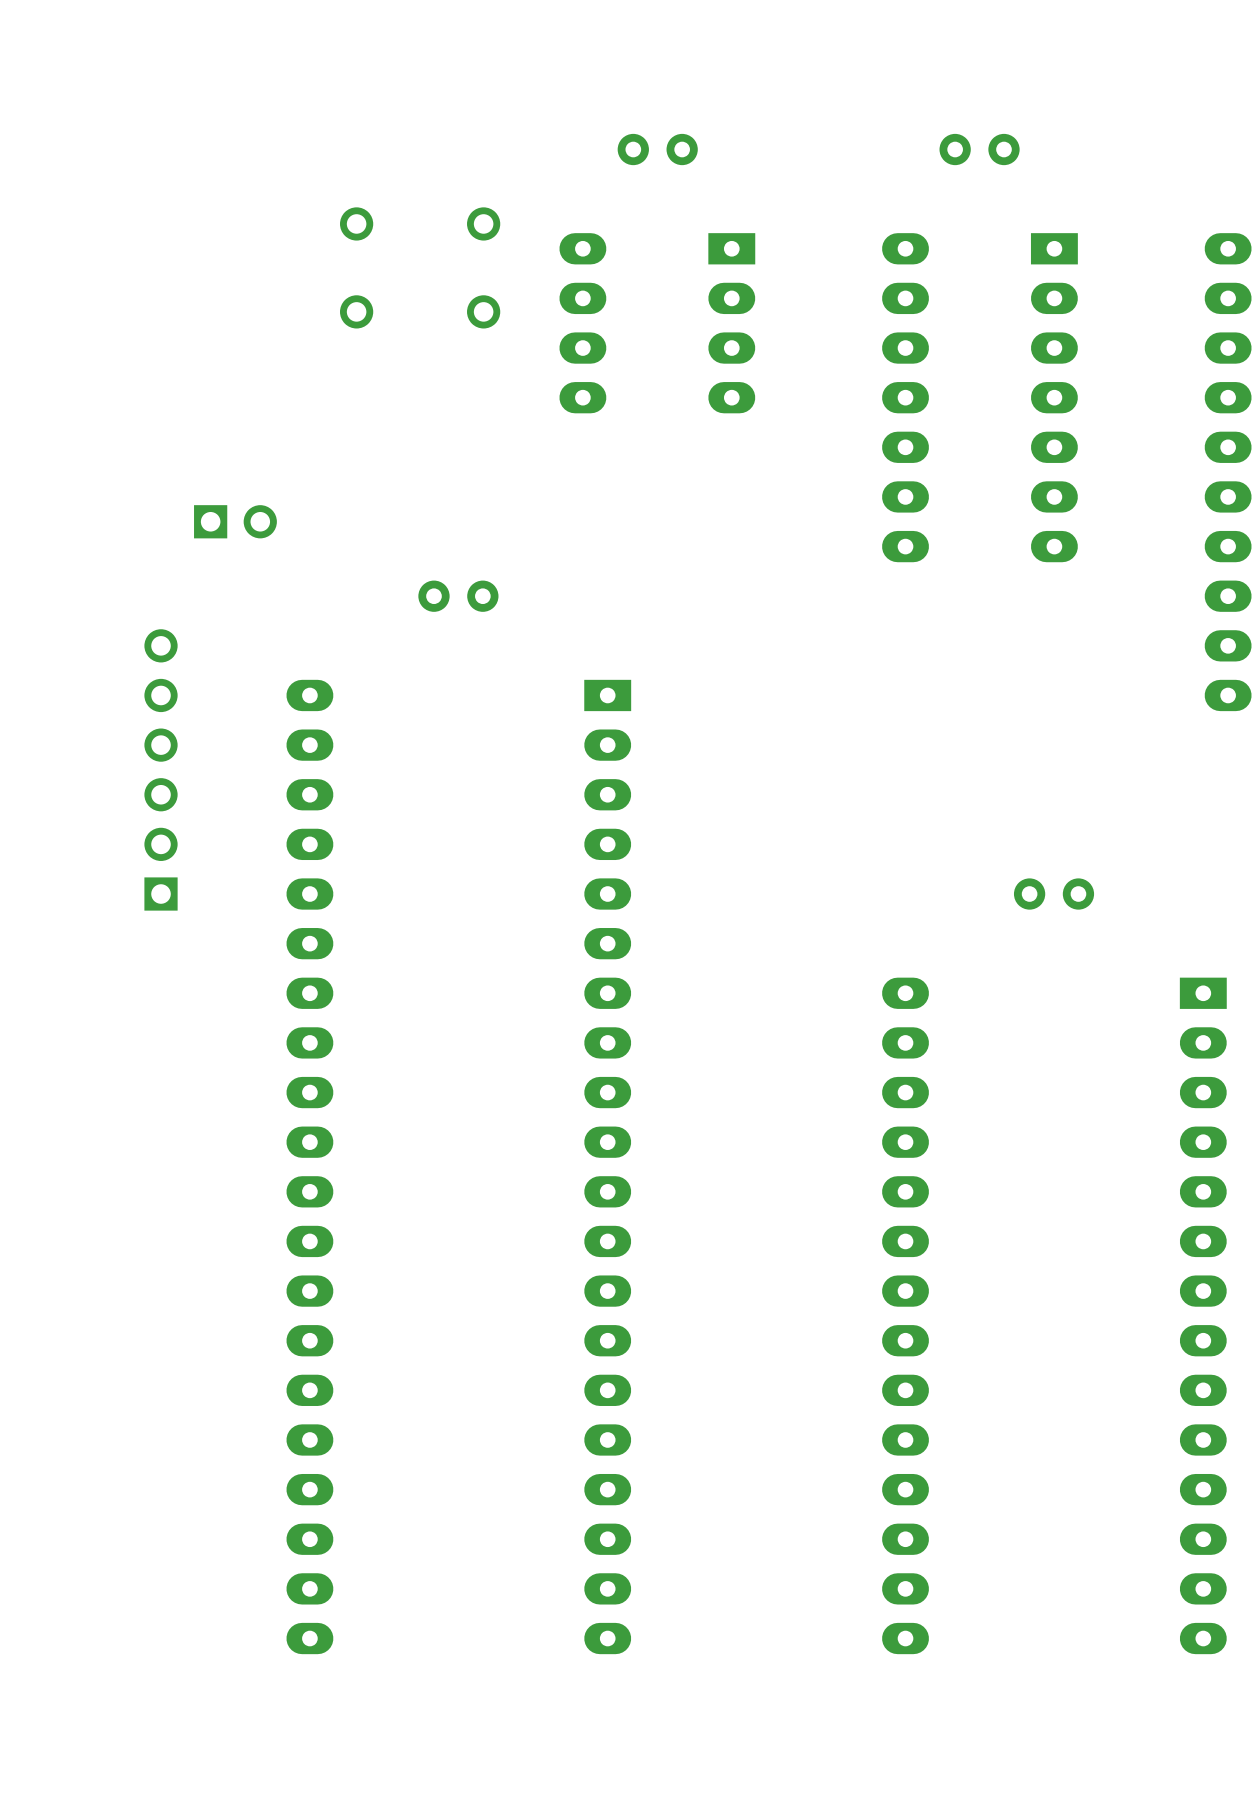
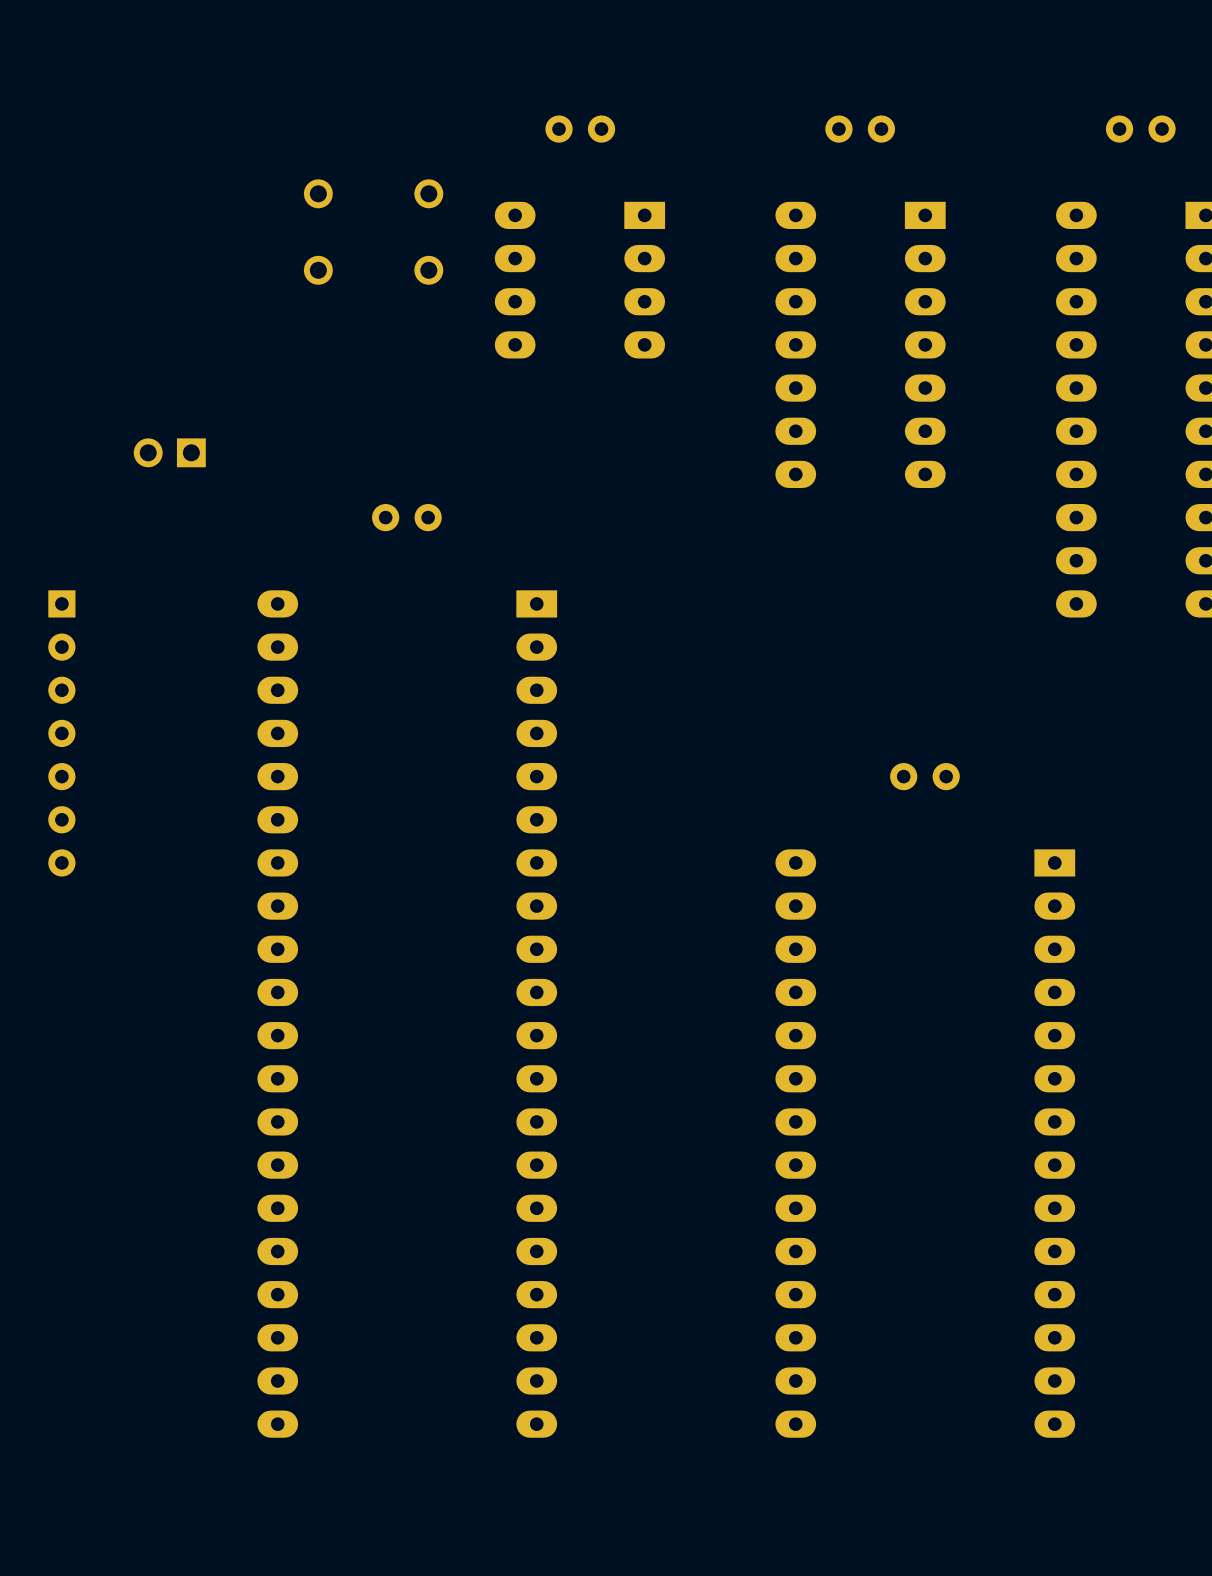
part rotation: 0° (235, 521) -> 180° (169, 452)
part: (161, 769) -> none
part: none -> (61, 733)

